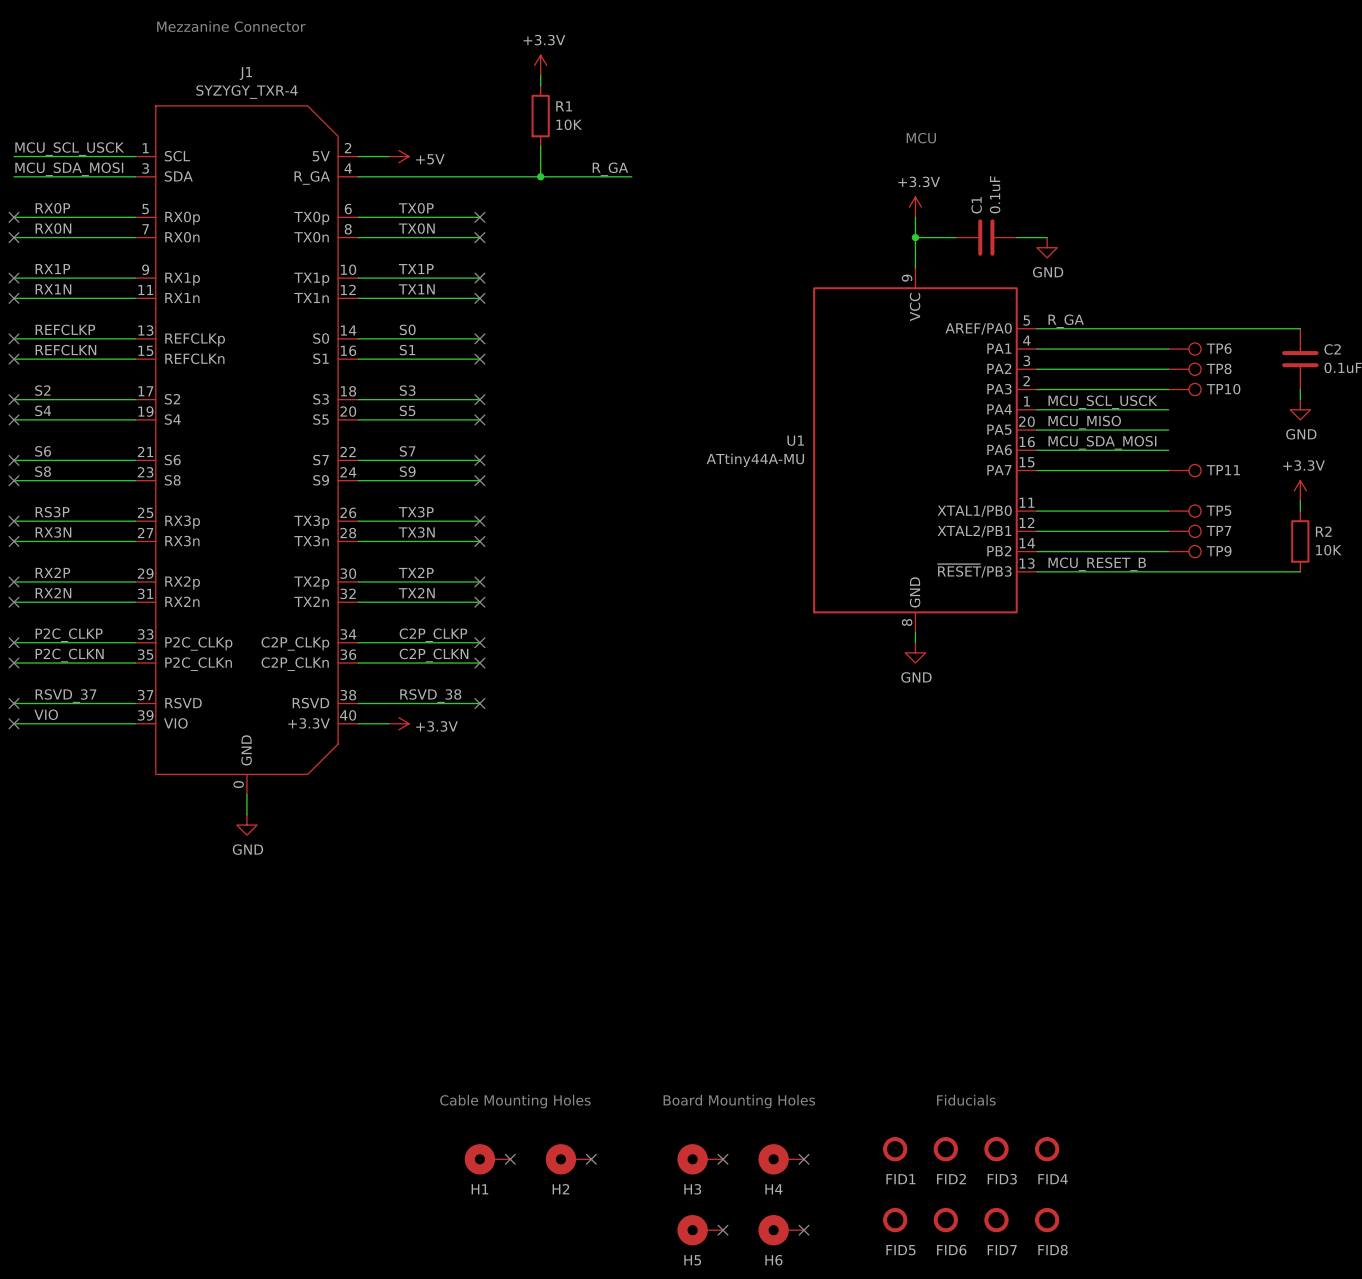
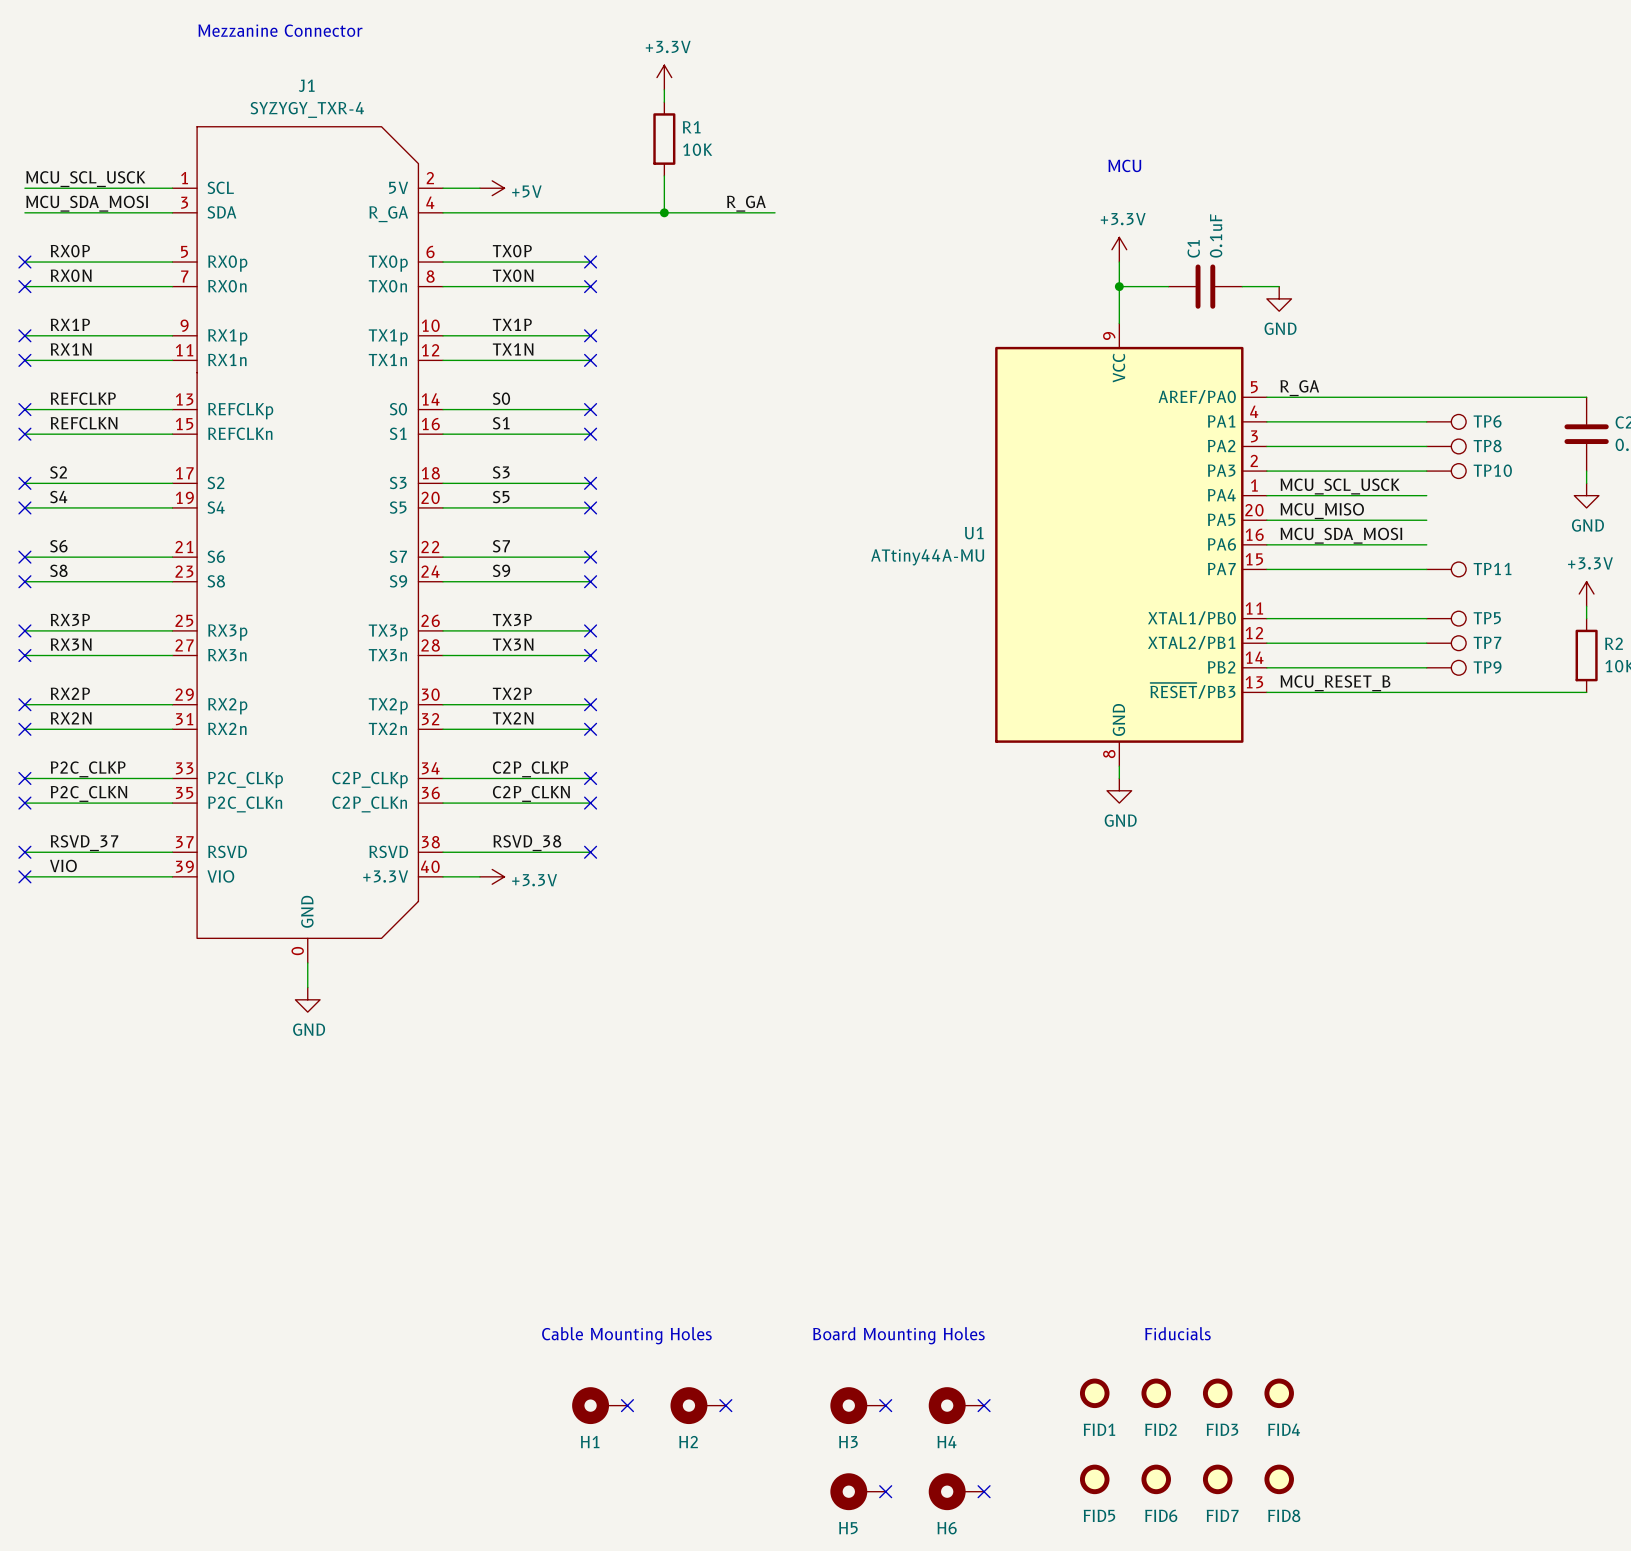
label: RS3P (52, 512) -> RX3P (70, 619)

